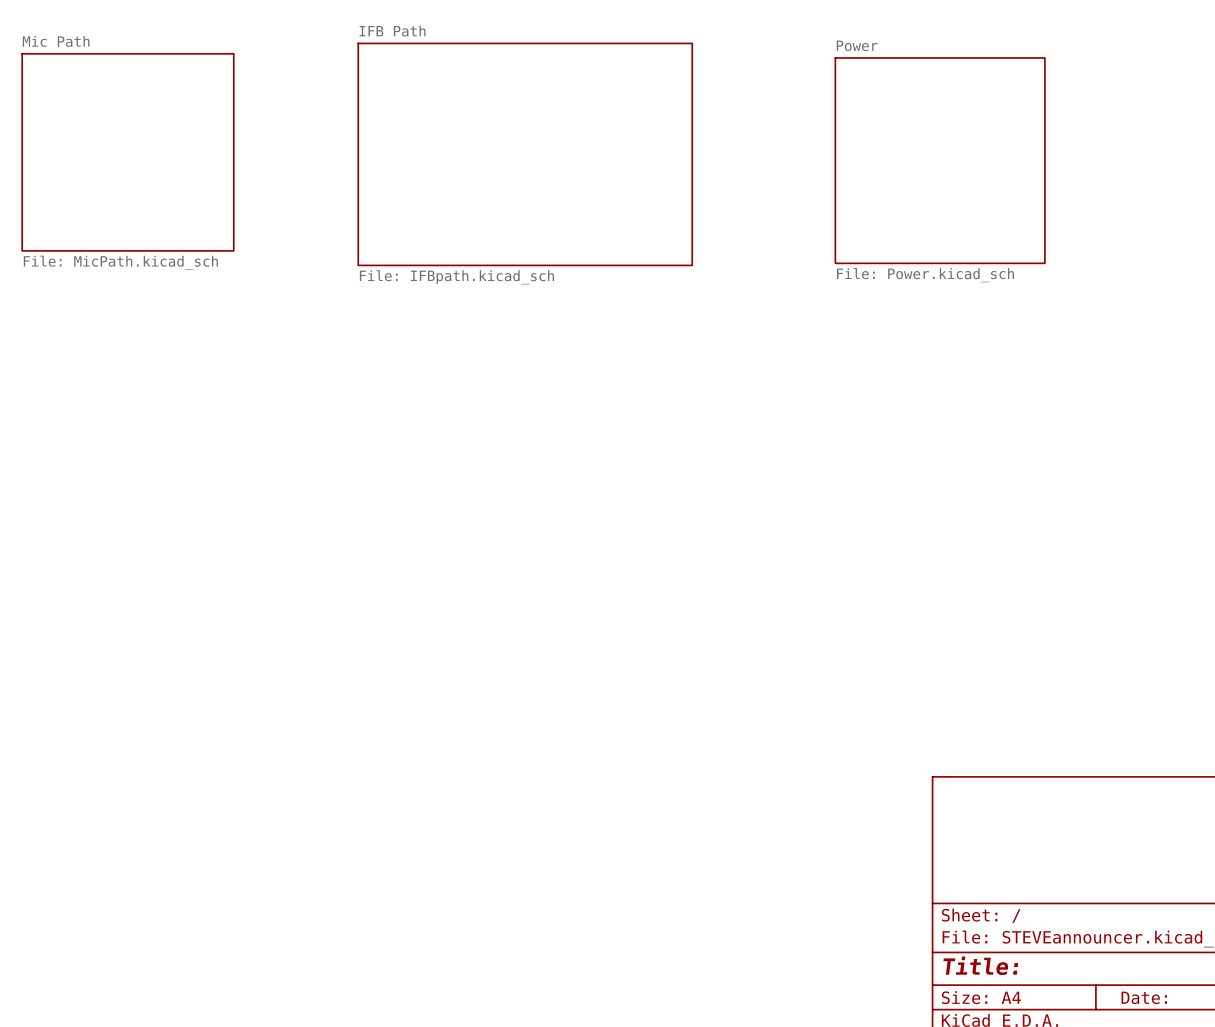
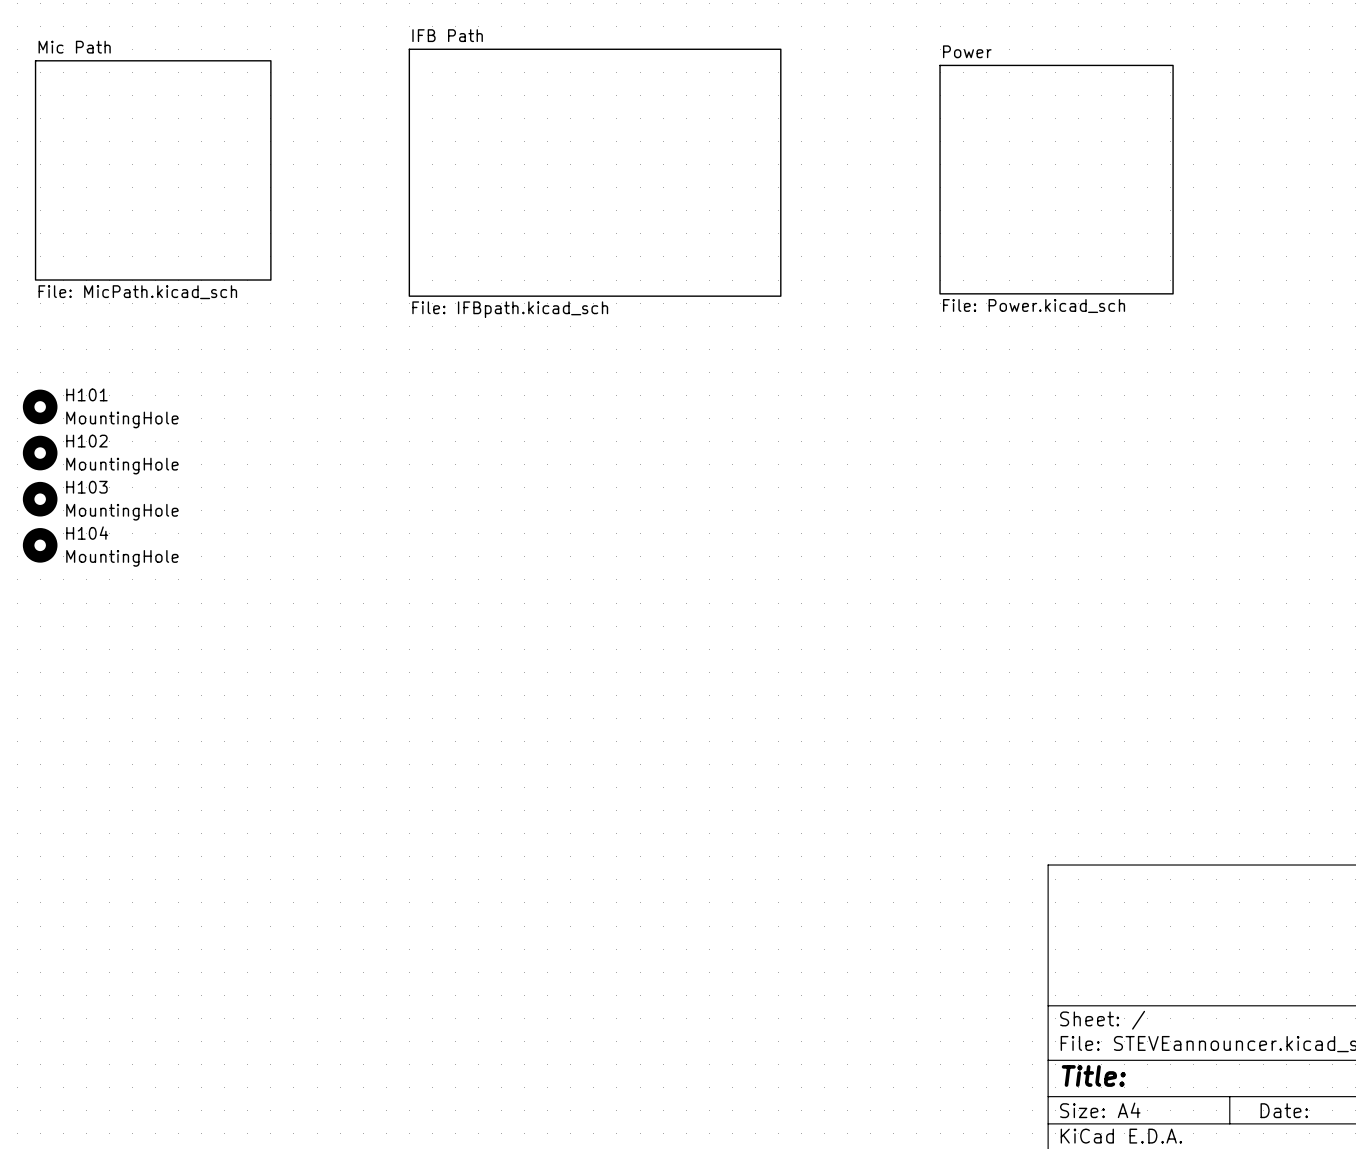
H101: none -> MountingHole (40, 406)
H102: none -> MountingHole (40, 453)
H103: none -> MountingHole (40, 499)
H104: none -> MountingHole (40, 545)

